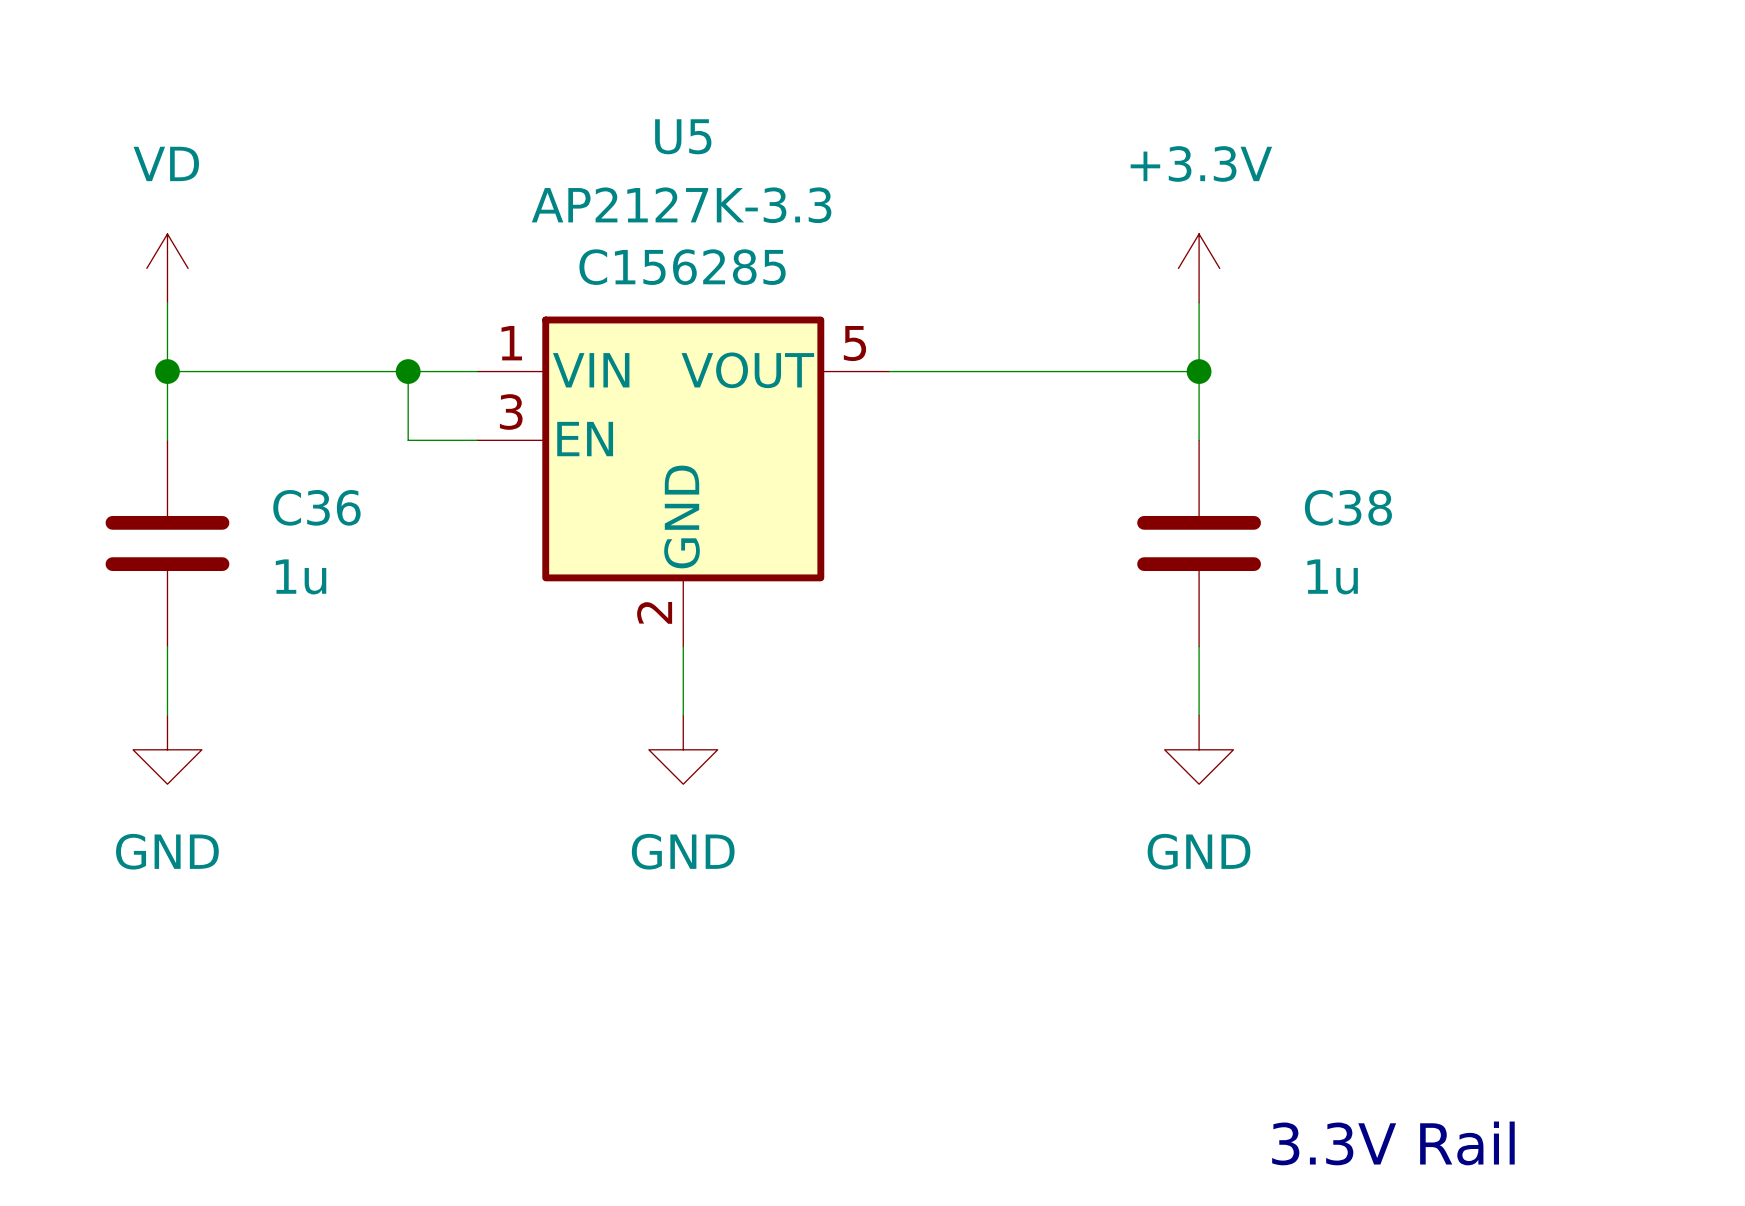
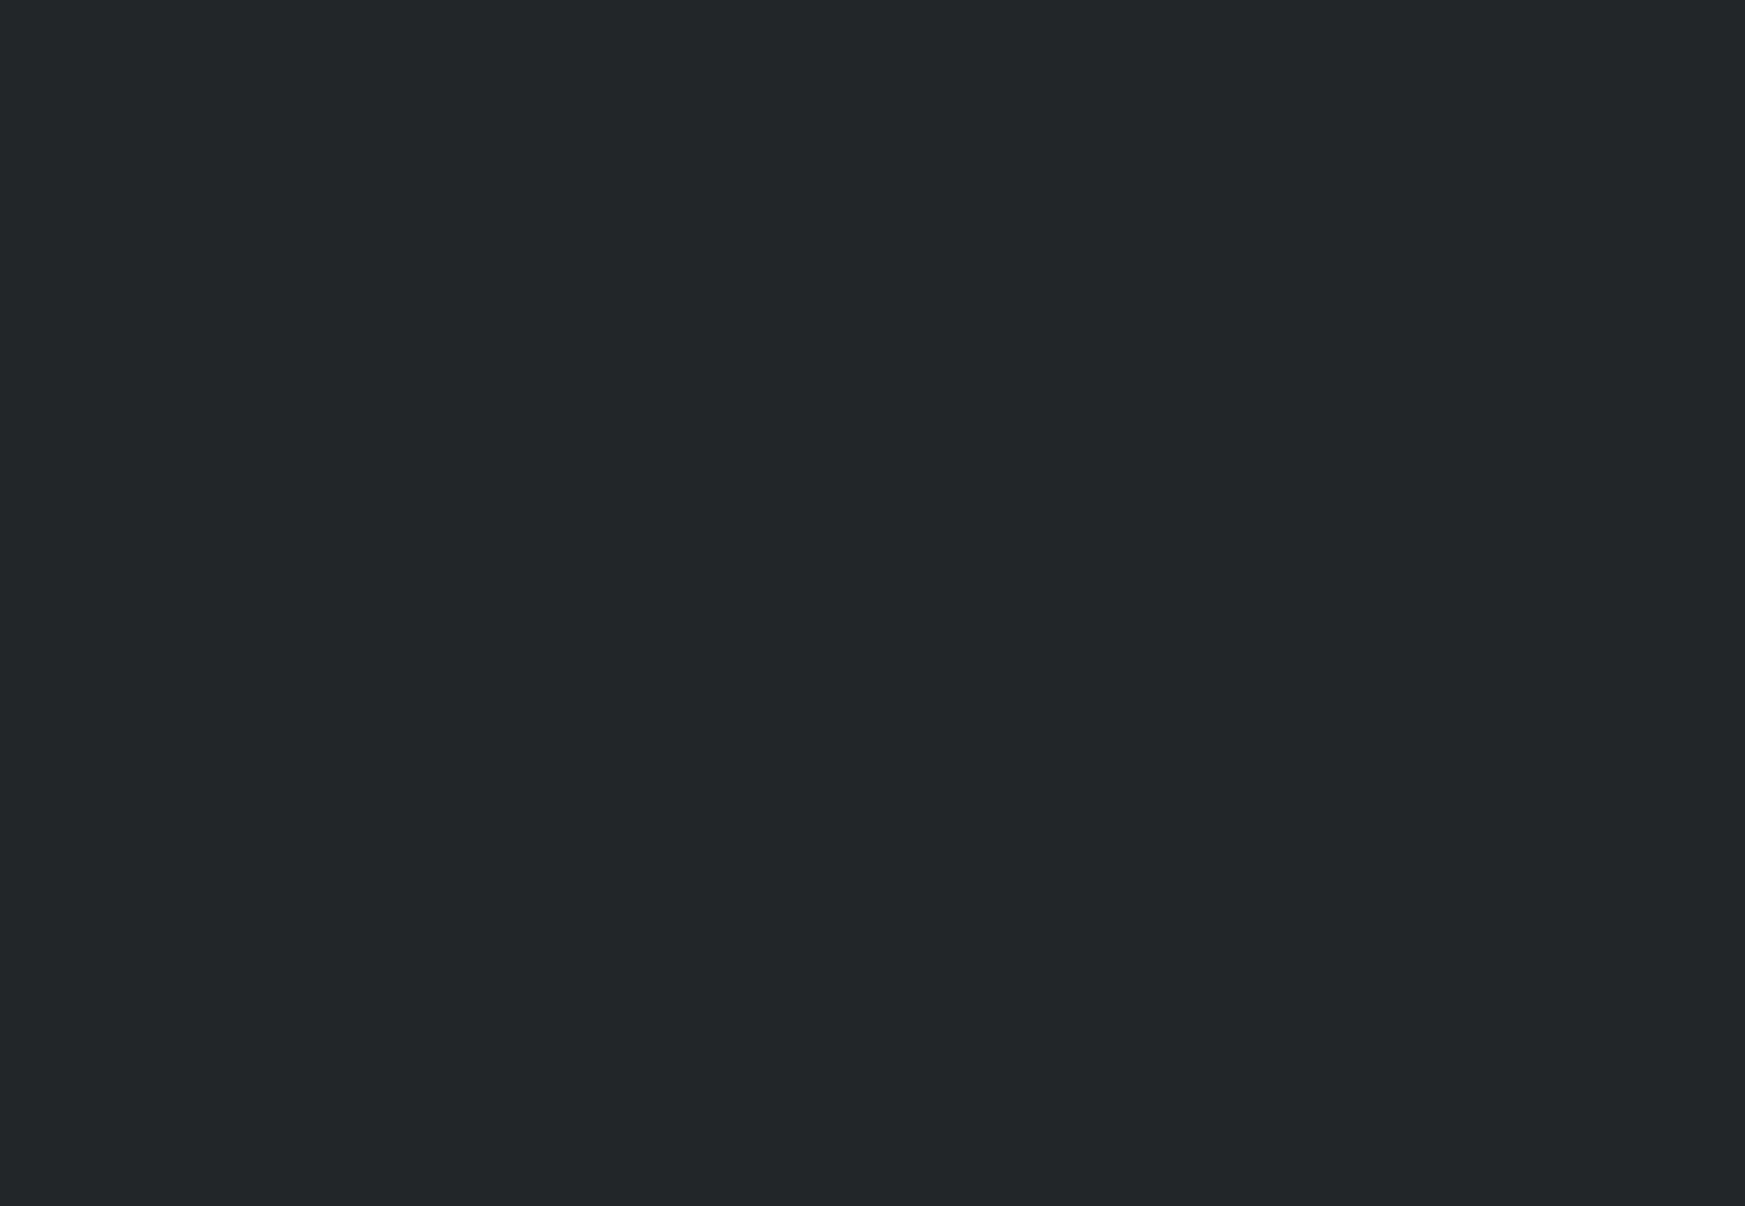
power symbol: VD (167, 268) -> none
power symbol: +3.3V (1199, 268) -> none
wire: (167, 302) (167, 440) -> none
wire: (1199, 302) (1199, 440) -> none
wire: (167, 371) (476, 371) -> none
junction: (167, 371) -> none
wire: (408, 371) (408, 440) (476, 440) -> none
junction: (408, 371) -> none
wire: (889, 371) (1199, 371) -> none
junction: (1199, 371) -> none
U5: AP2127K-3.3 (683, 481) -> none
C36: 1u (167, 543) -> none
C38: 1u (1199, 543) -> none
wire: (167, 646) (167, 715) -> none
wire: (683, 646) (683, 715) -> none
wire: (1199, 646) (1199, 715) -> none
power symbol: GND (167, 749) -> none
power symbol: GND (683, 749) -> none
power symbol: GND (1199, 749) -> none
text: 3.3V Rail (1393, 1143) -> none

